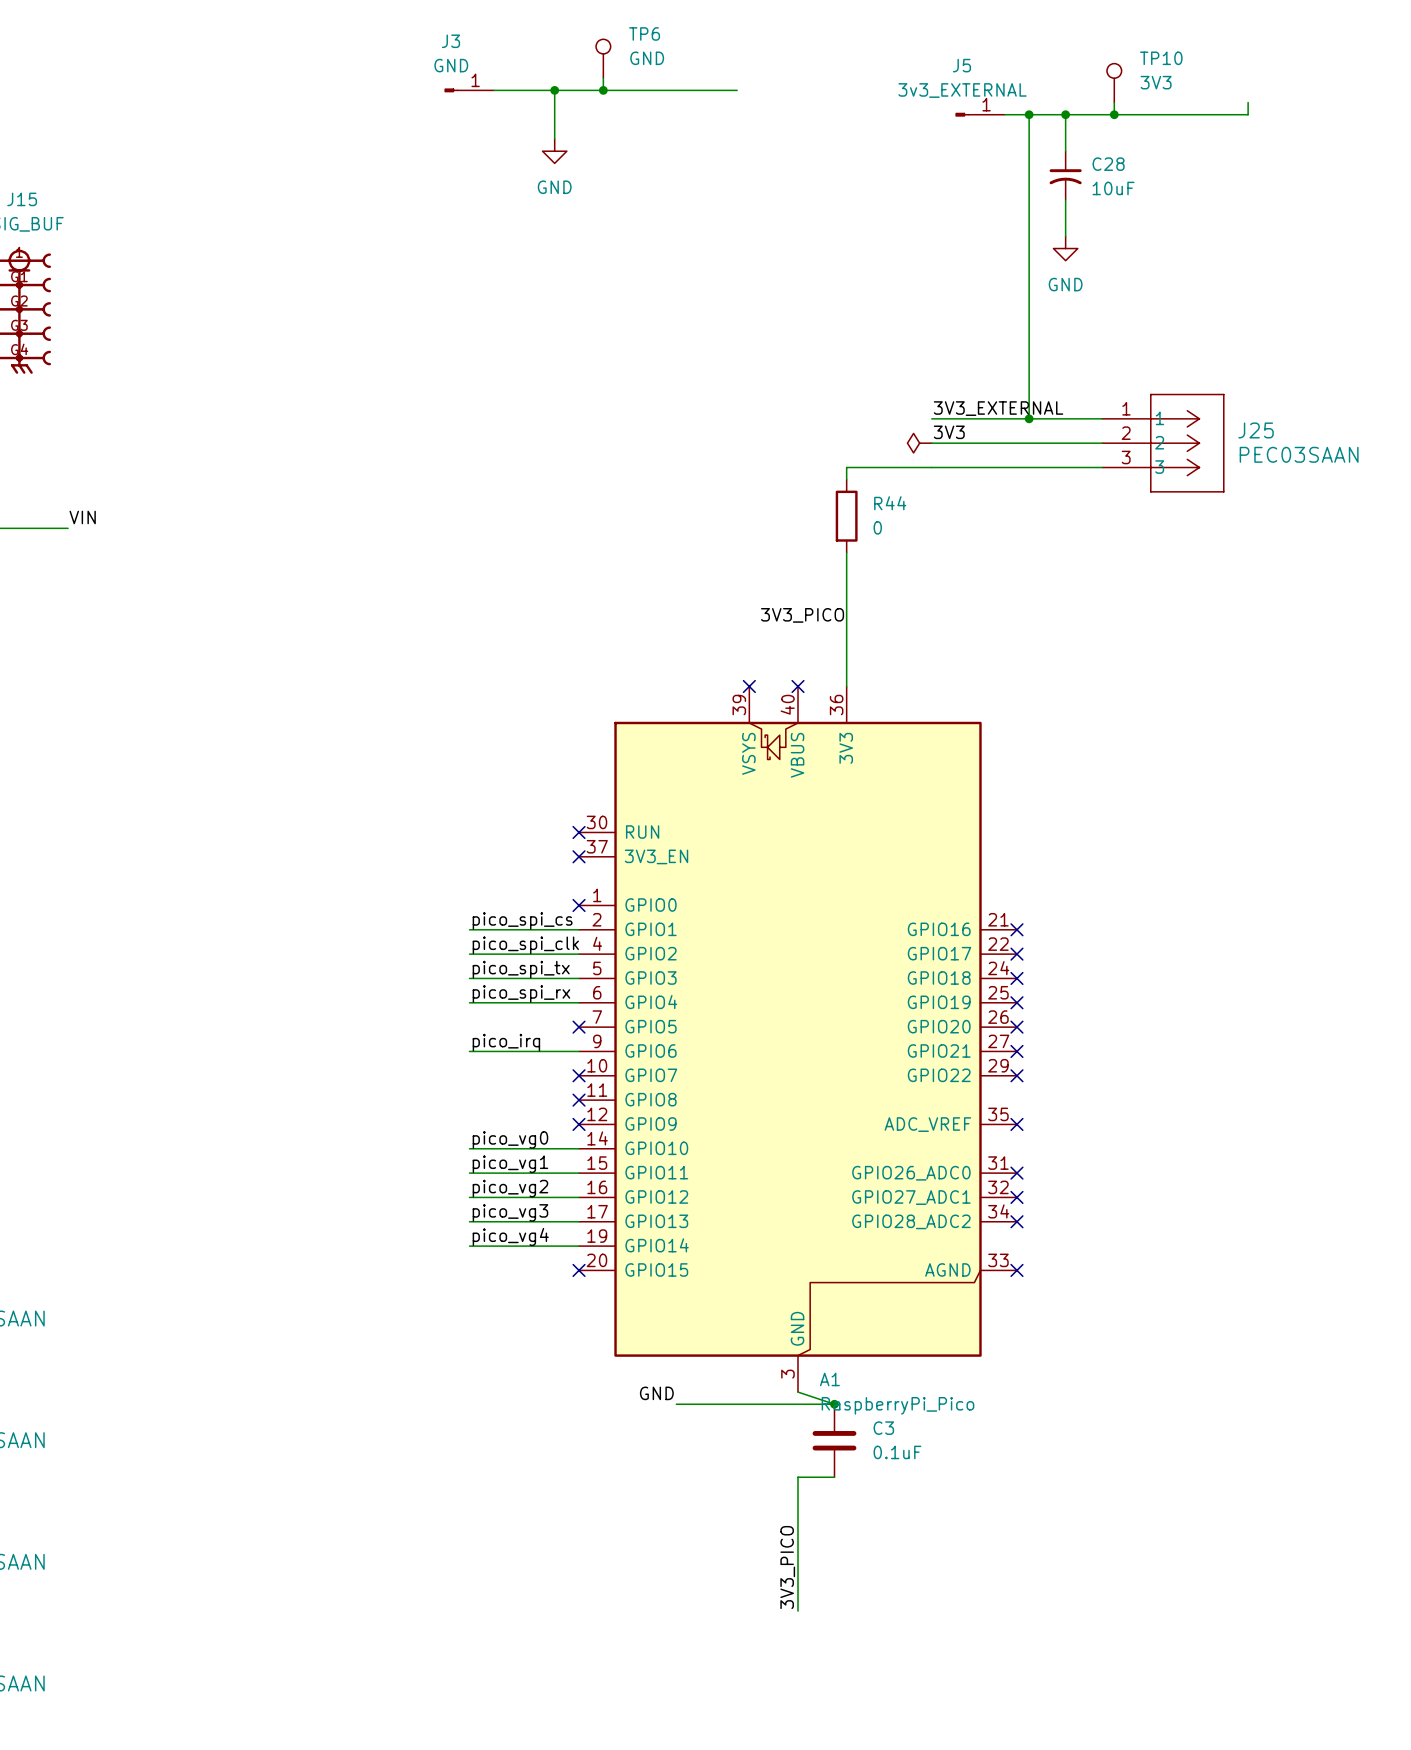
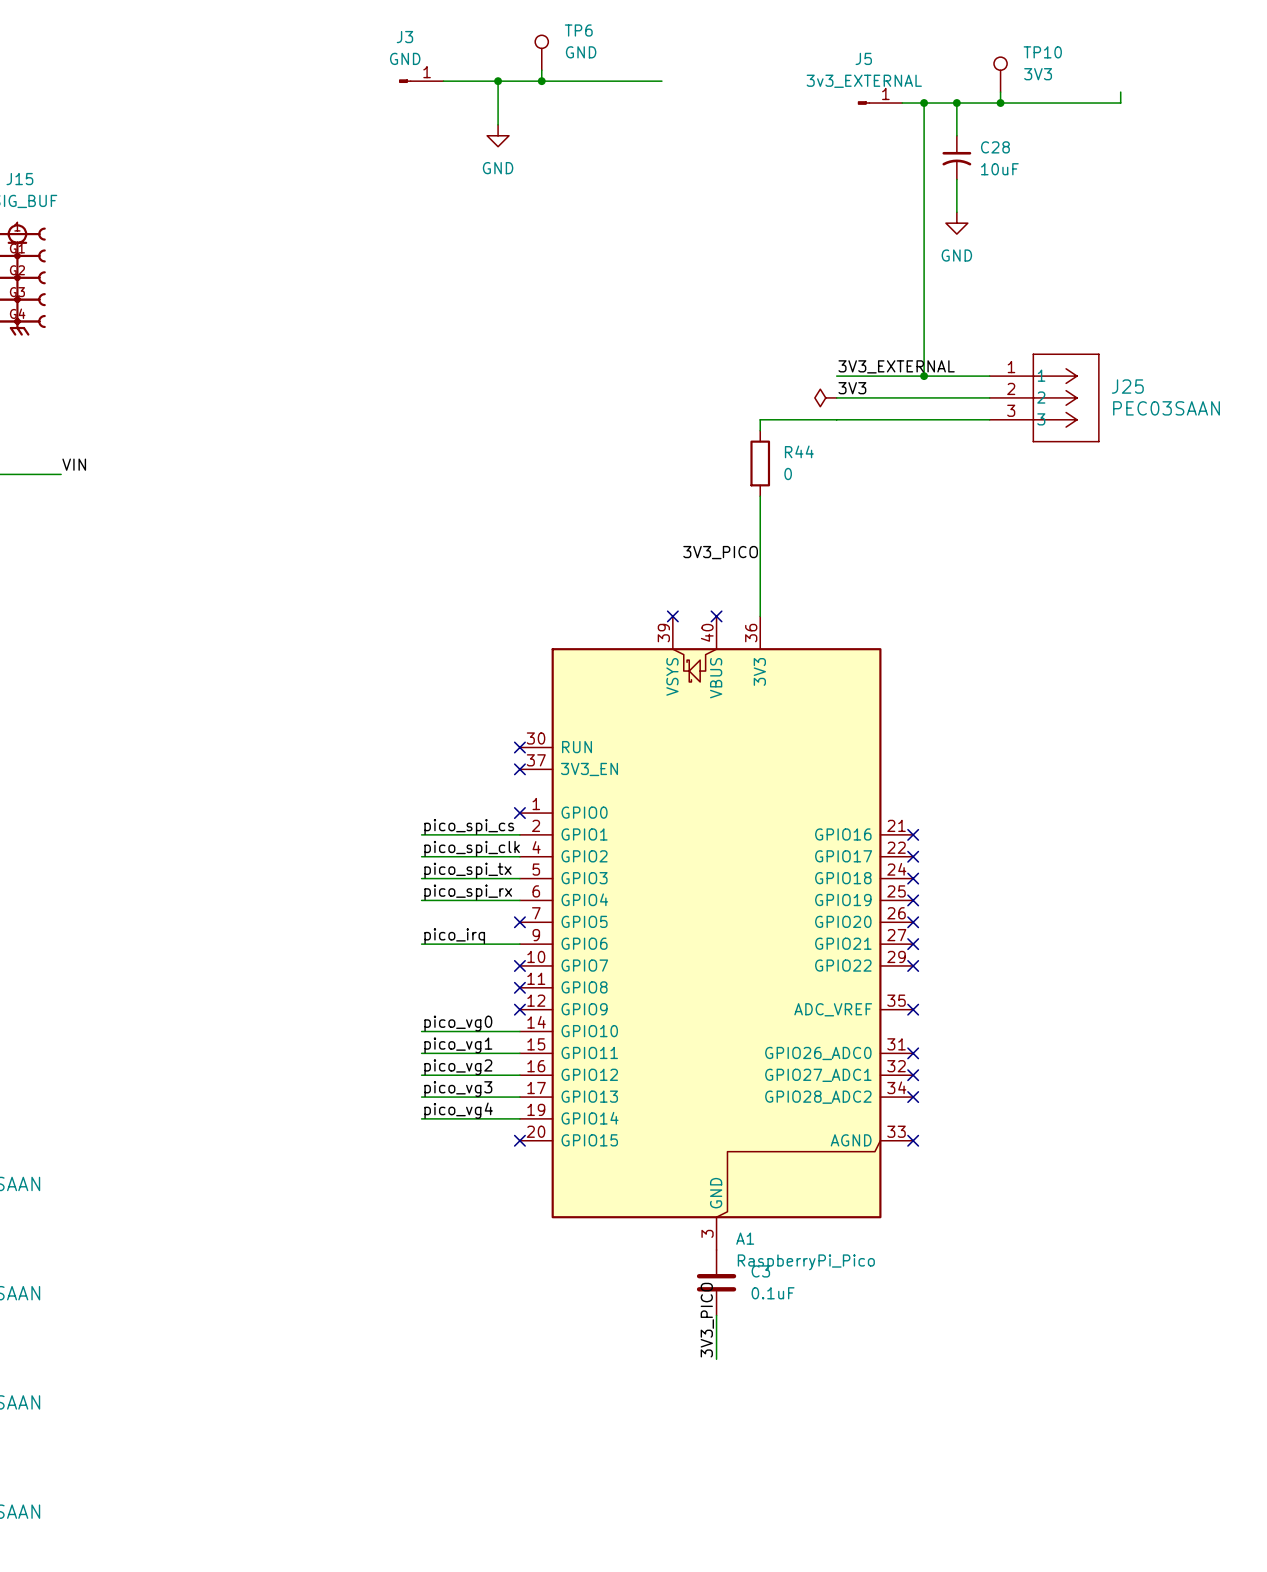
wire: (798, 1392) (834, 1404) (676, 1404) -> none
label: GND (656, 1393) -> none
junction: (834, 1404) -> none
C3 position: (834, 1440) -> (716, 1282)
wire: (798, 1477) (834, 1477) -> (716, 1326) (716, 1315)
wire: (798, 1513) (798, 1611) -> none
label position: 3V3_PICO (787, 1567) -> 3V3_PICO (707, 1320)

